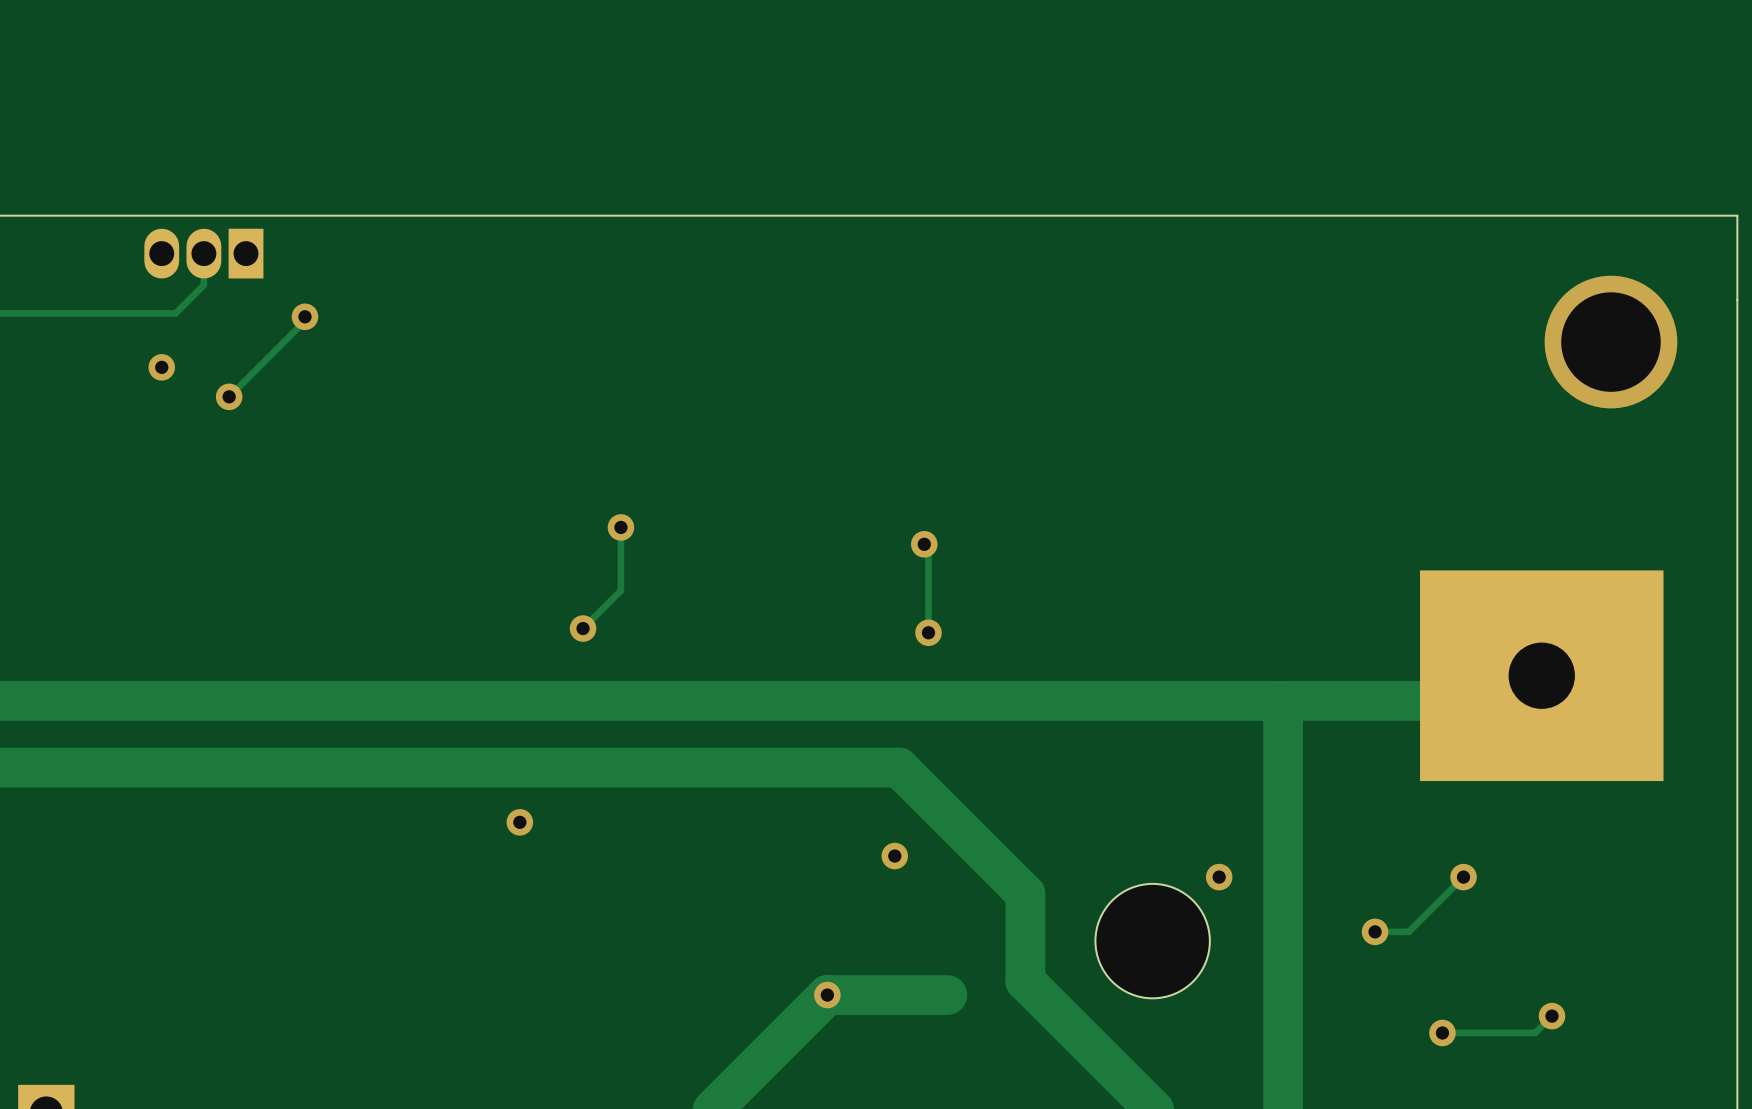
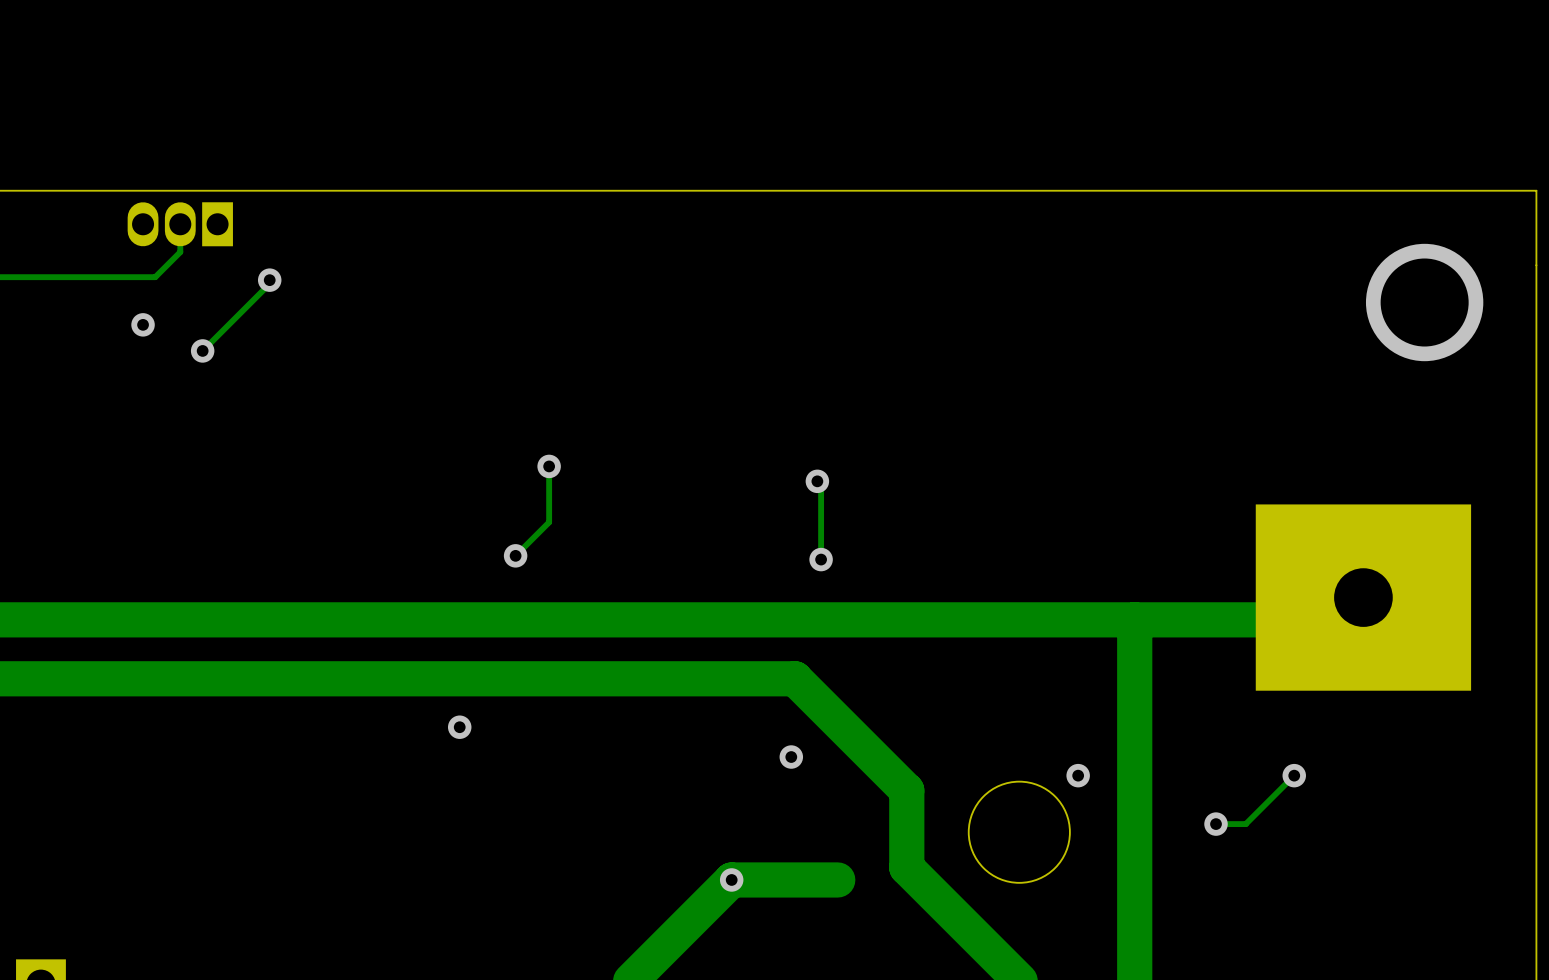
track: (1551, 1016) (1535, 1032) (1442, 1032) -> none
via: (1551, 1016) -> none
via: (1442, 1032) -> none

